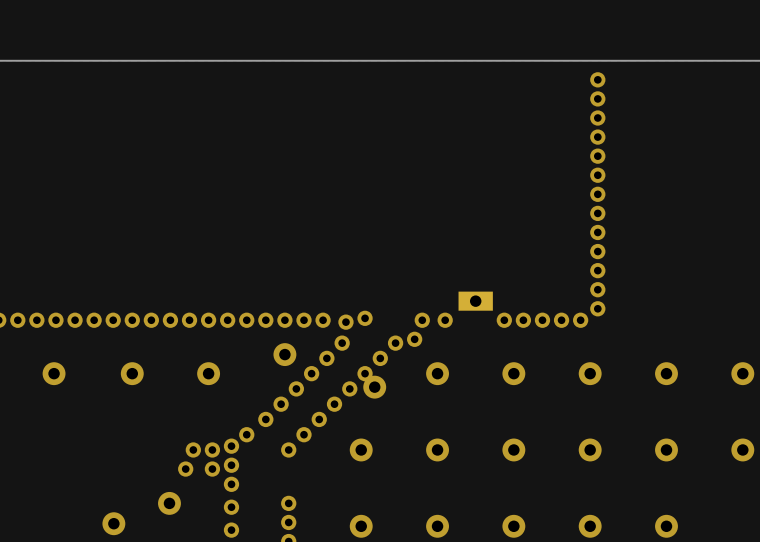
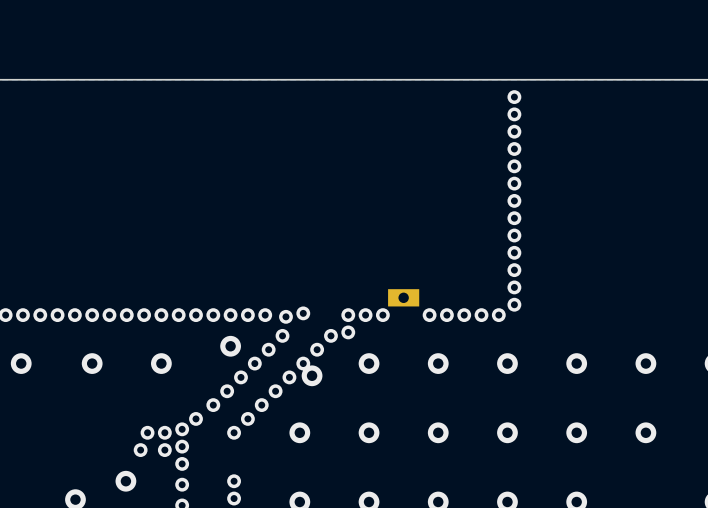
via: none -> (348, 315)
via: (422, 320) -> none
via: none -> (365, 315)
via: (445, 320) -> none
via: none -> (382, 315)

